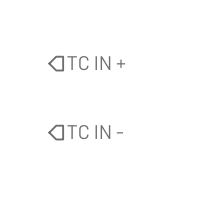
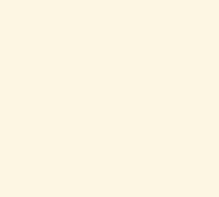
hierarchical label: TC IN + (96, 63) -> none
hierarchical label: TC IN - (95, 132) -> none

